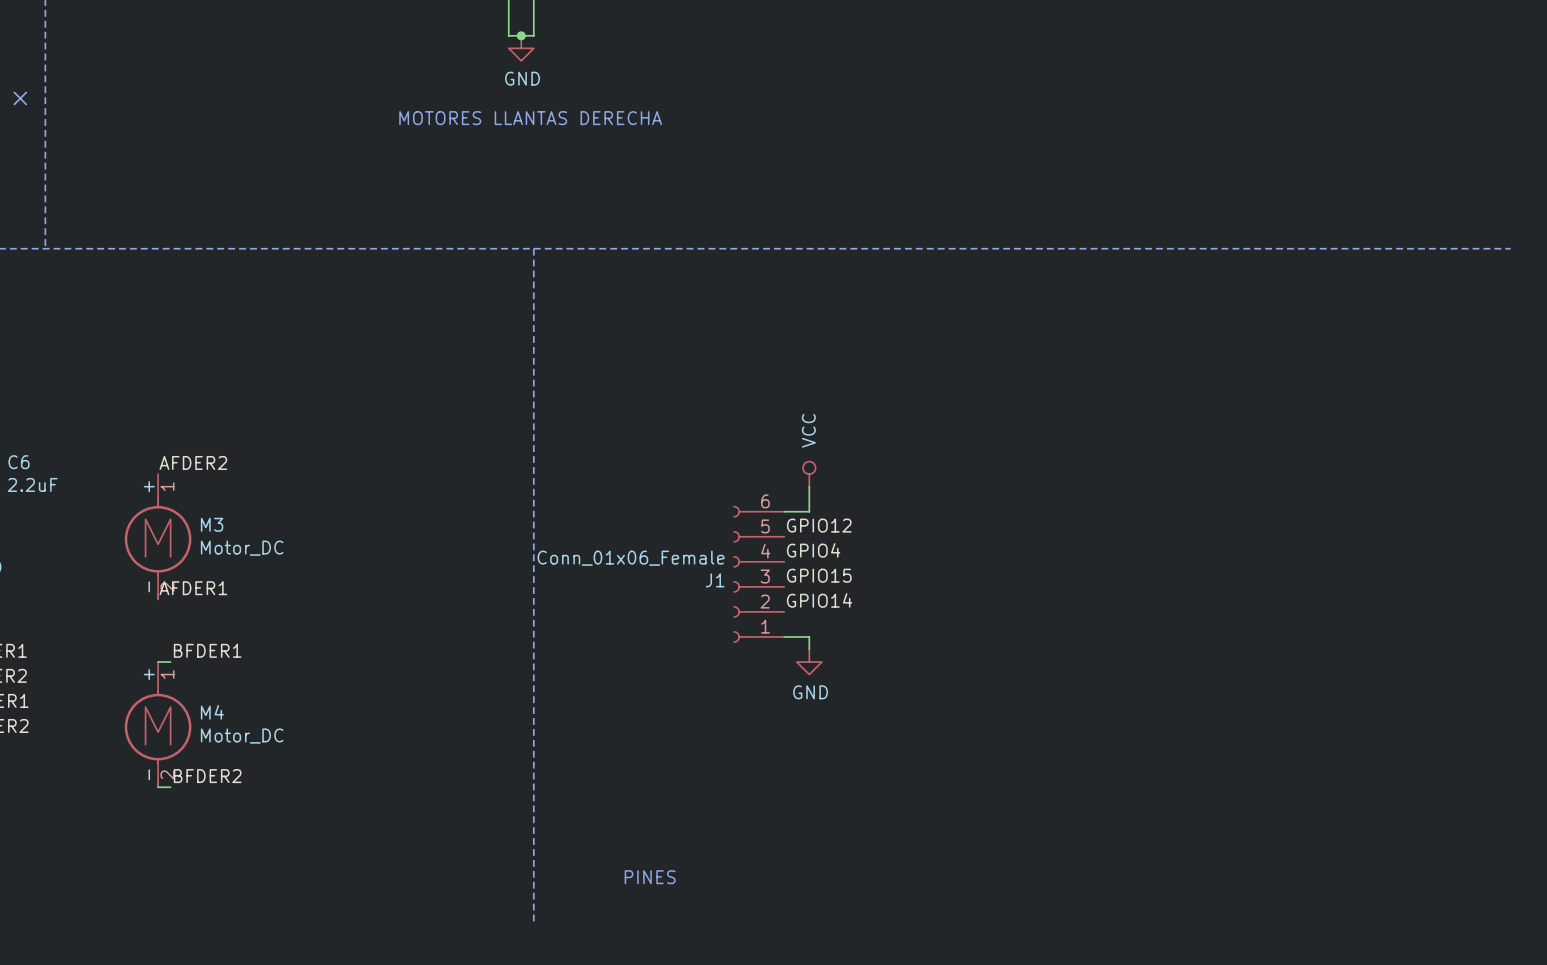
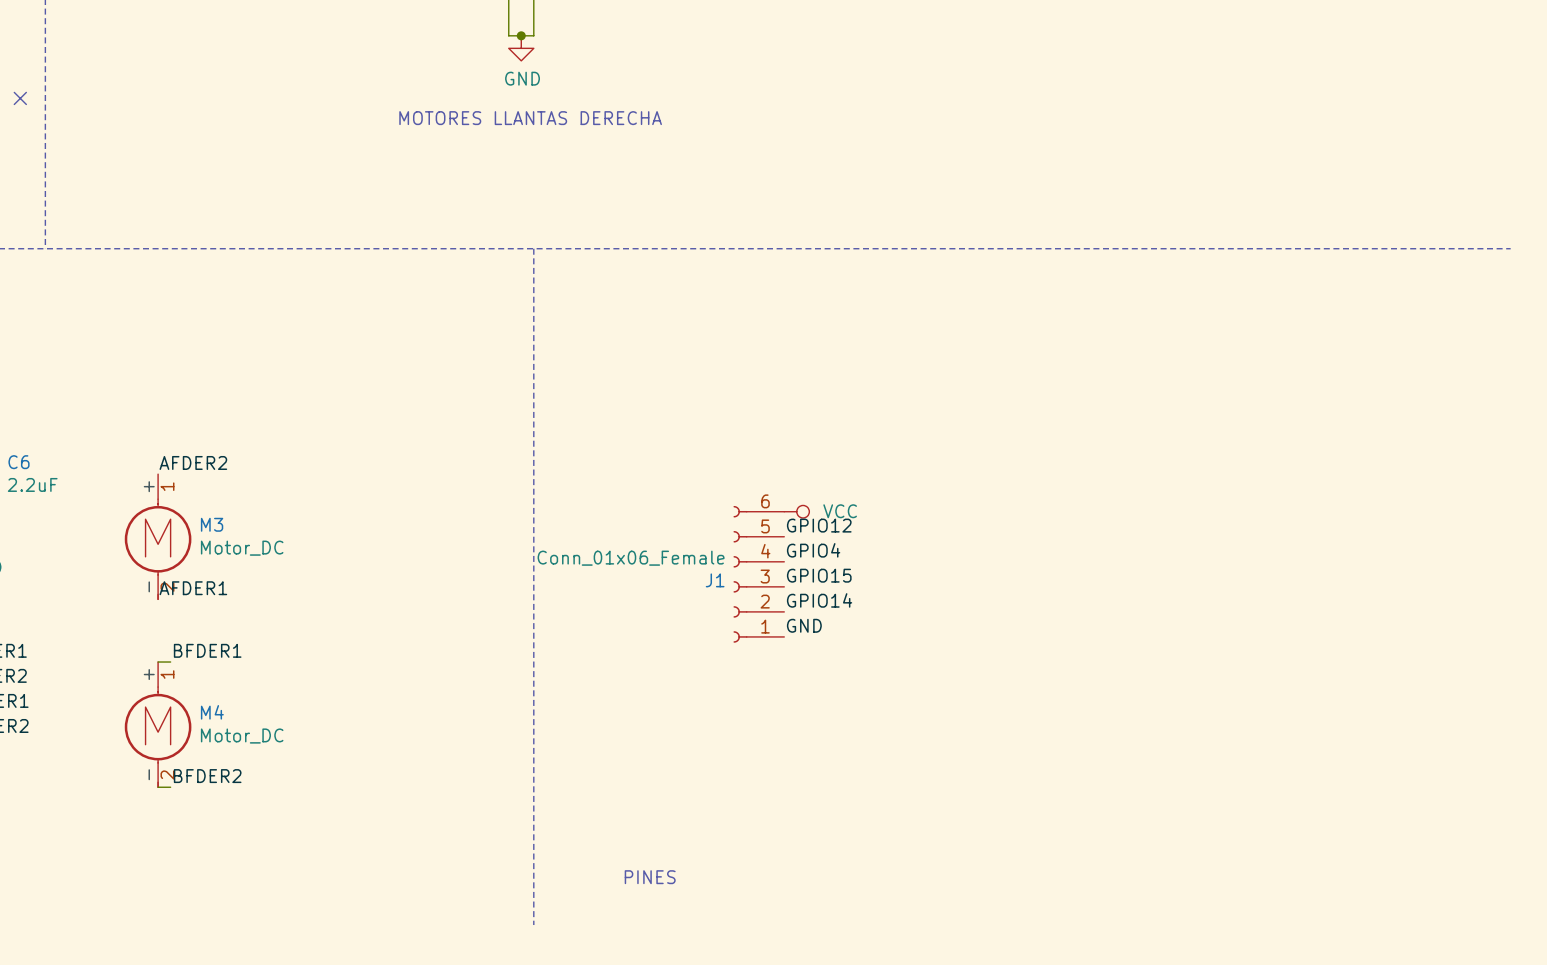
power symbol rotation: 0° (809, 474) -> 90° clockwise (796, 511)
power symbol position: VCC (809, 474) -> VCC (796, 511)
wire: (809, 486) (809, 511) (784, 511) -> none
label: none -> GND (804, 625)
wire: (784, 636) (809, 636) (809, 649) -> none
power symbol: GND (809, 662) -> none

